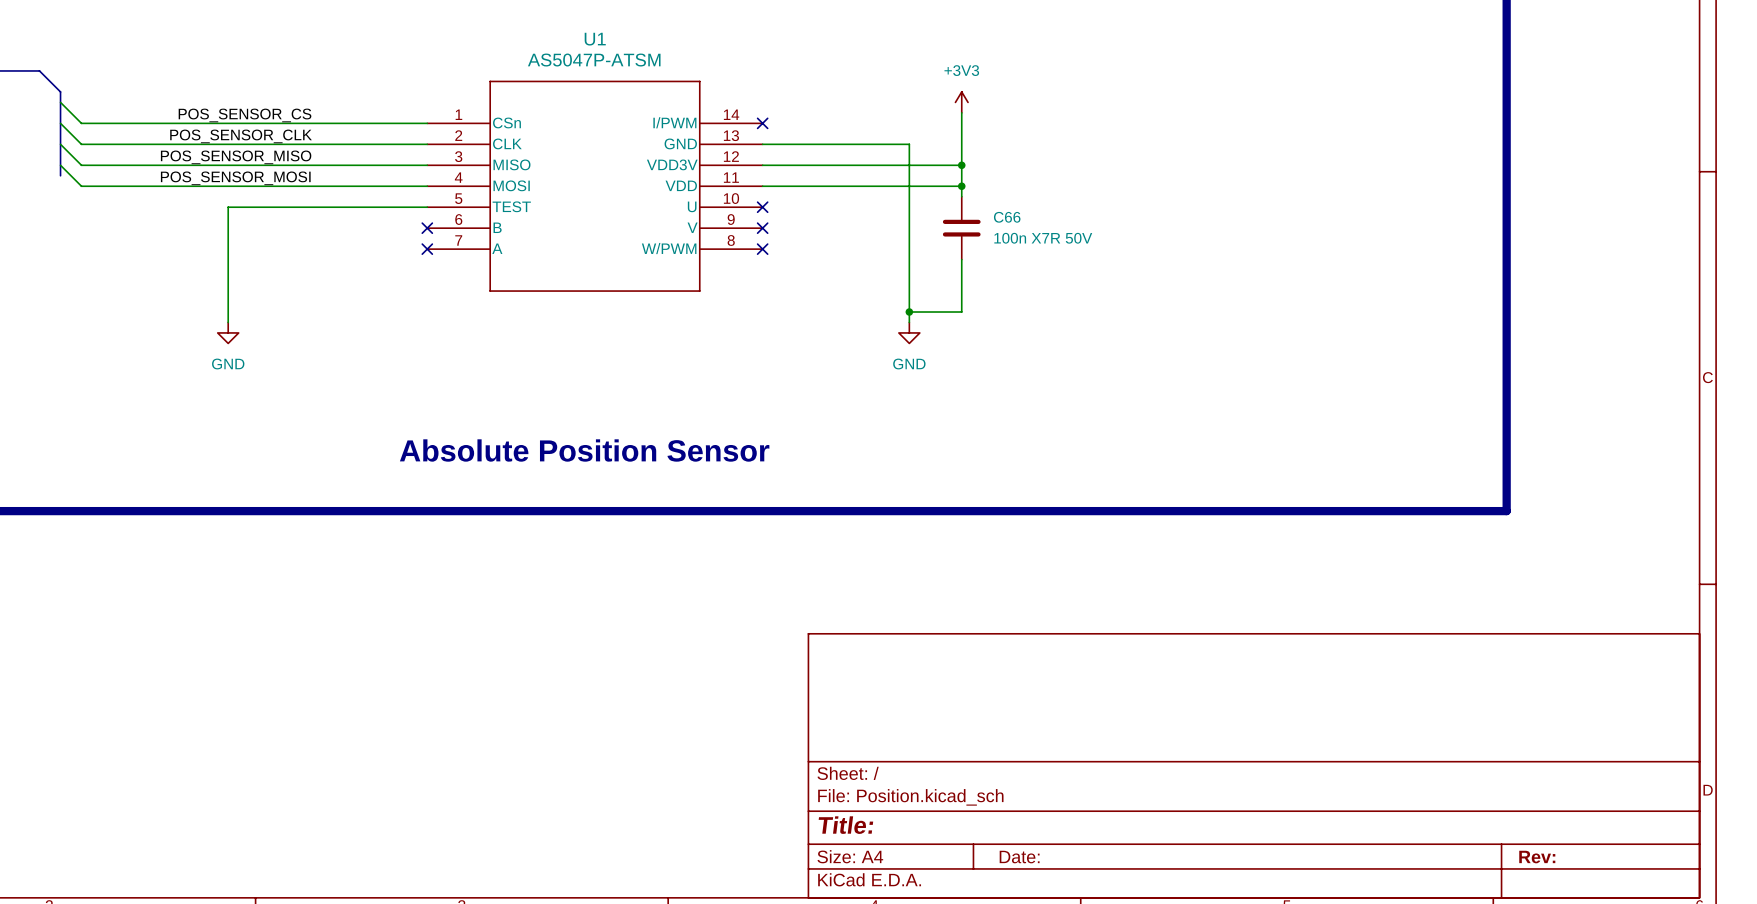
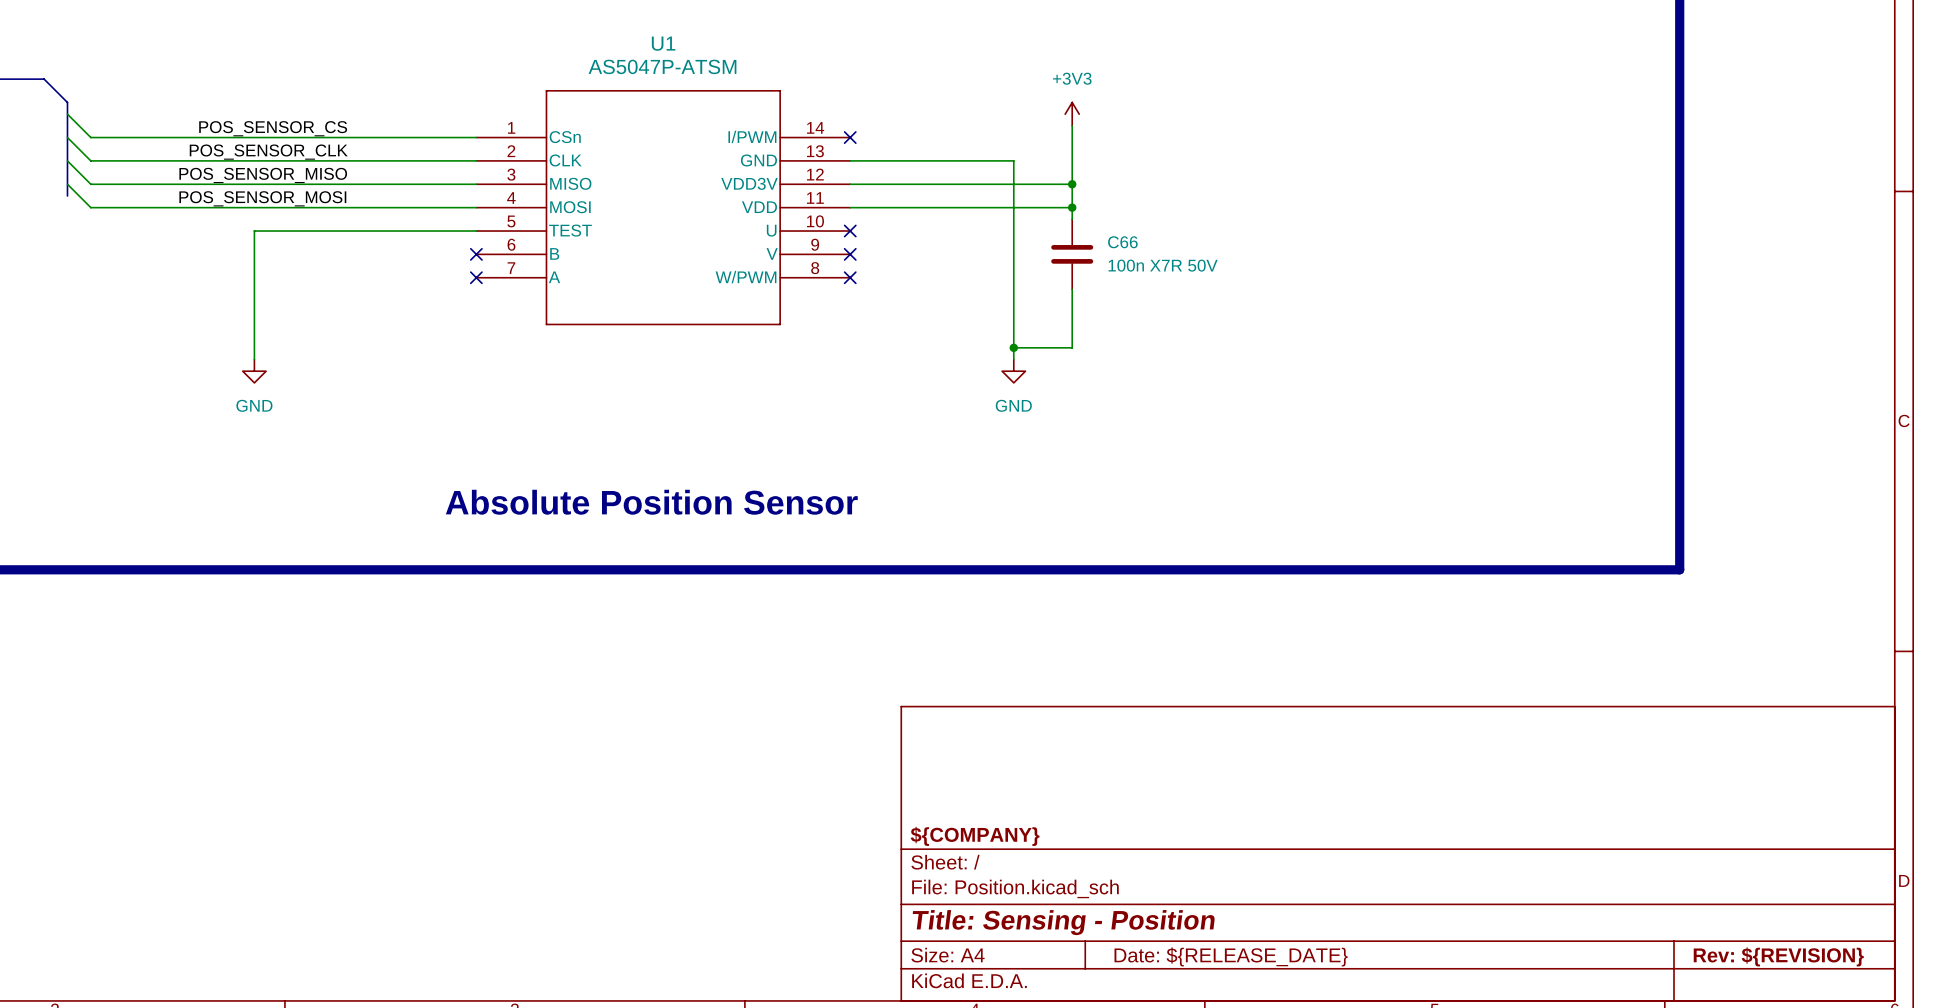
title block: none -> ${COMPANY} (975, 836)
title block: Title: (845, 825) -> Title: Sensing - Position (1063, 922)
title block: Date: (1019, 857) -> Date: ${RELEASE_DATE} (1231, 956)
title block: Rev: (1537, 857) -> Rev: ${REVISION} (1778, 956)

